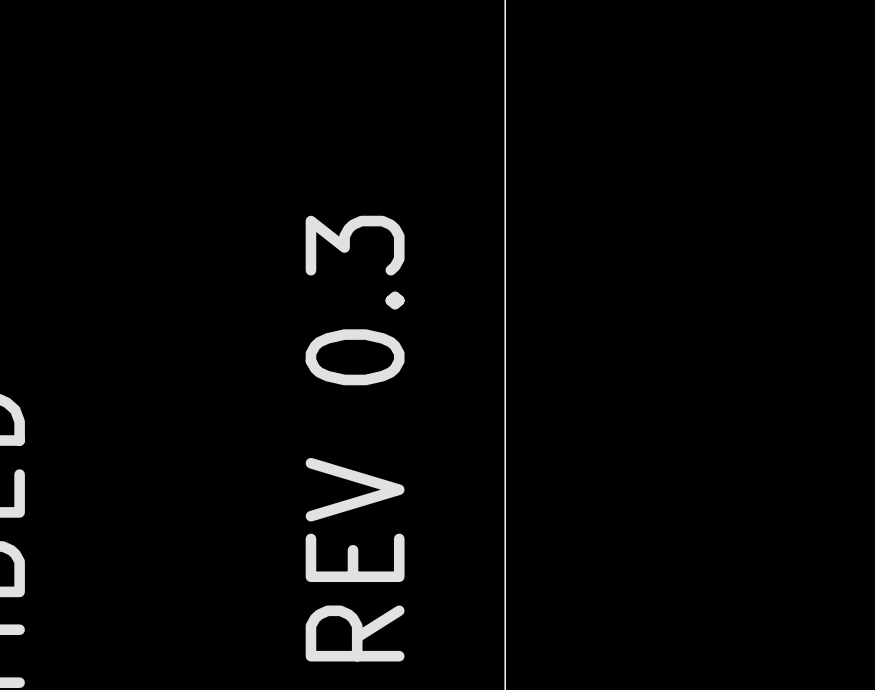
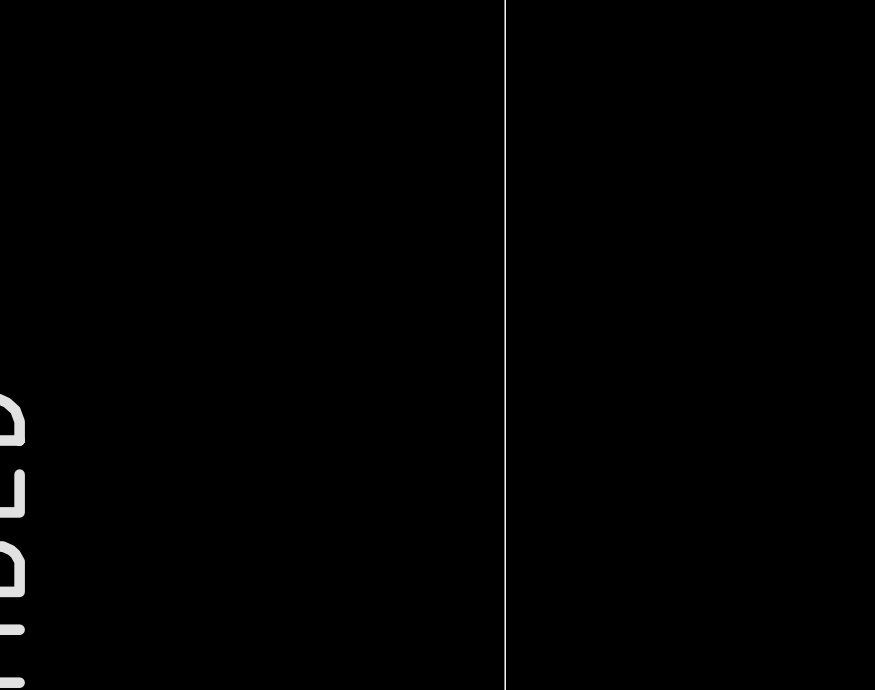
text: REV 0.3 (355, 438) -> none

